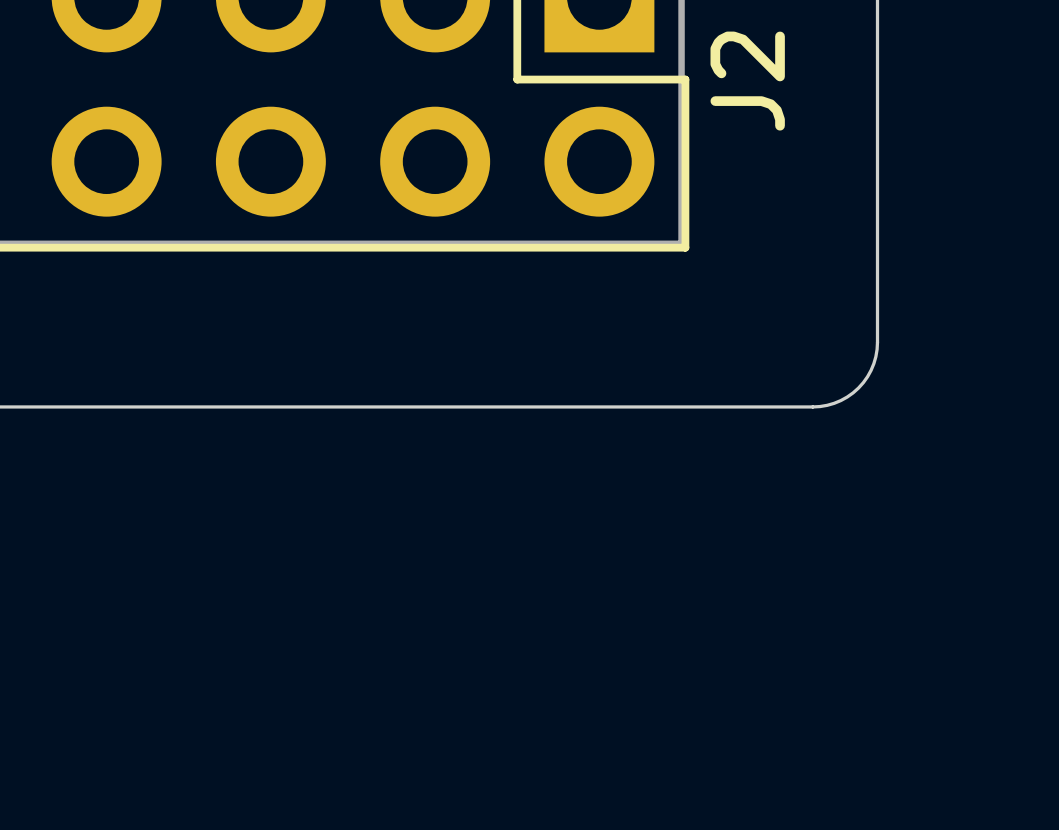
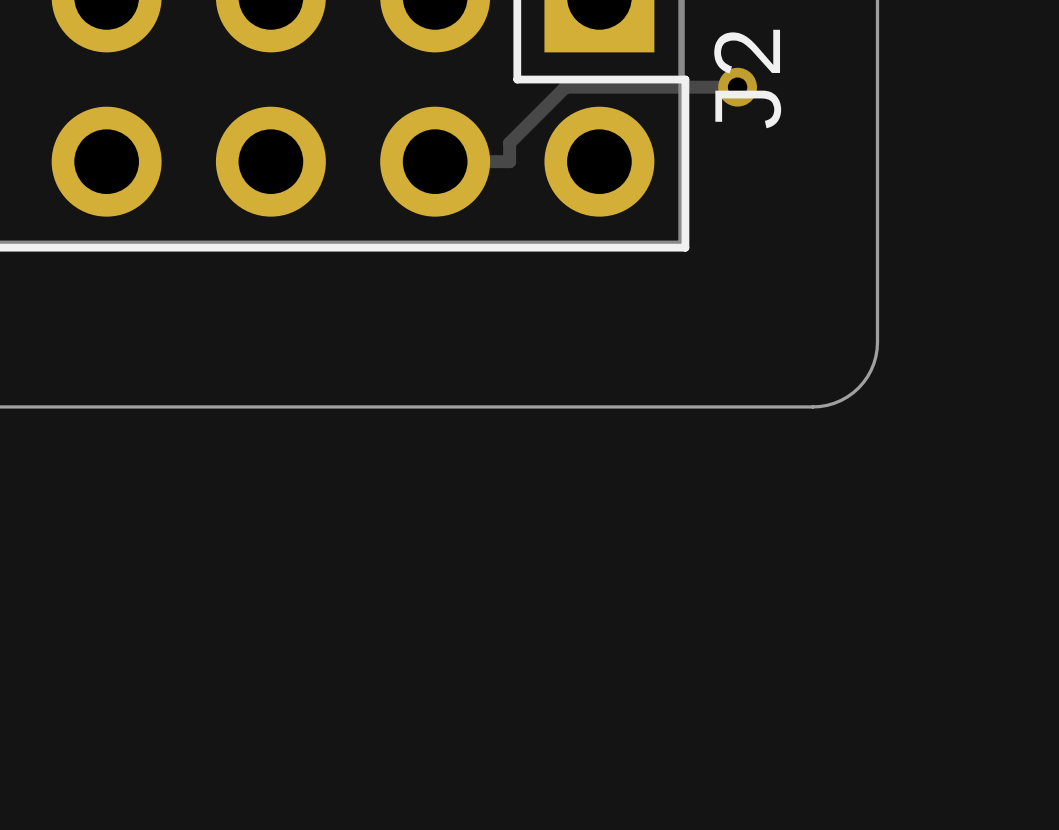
track: none -> (737, 87) (565, 87) (509, 143) (509, 161) (435, 161)
via: none -> (737, 87)

